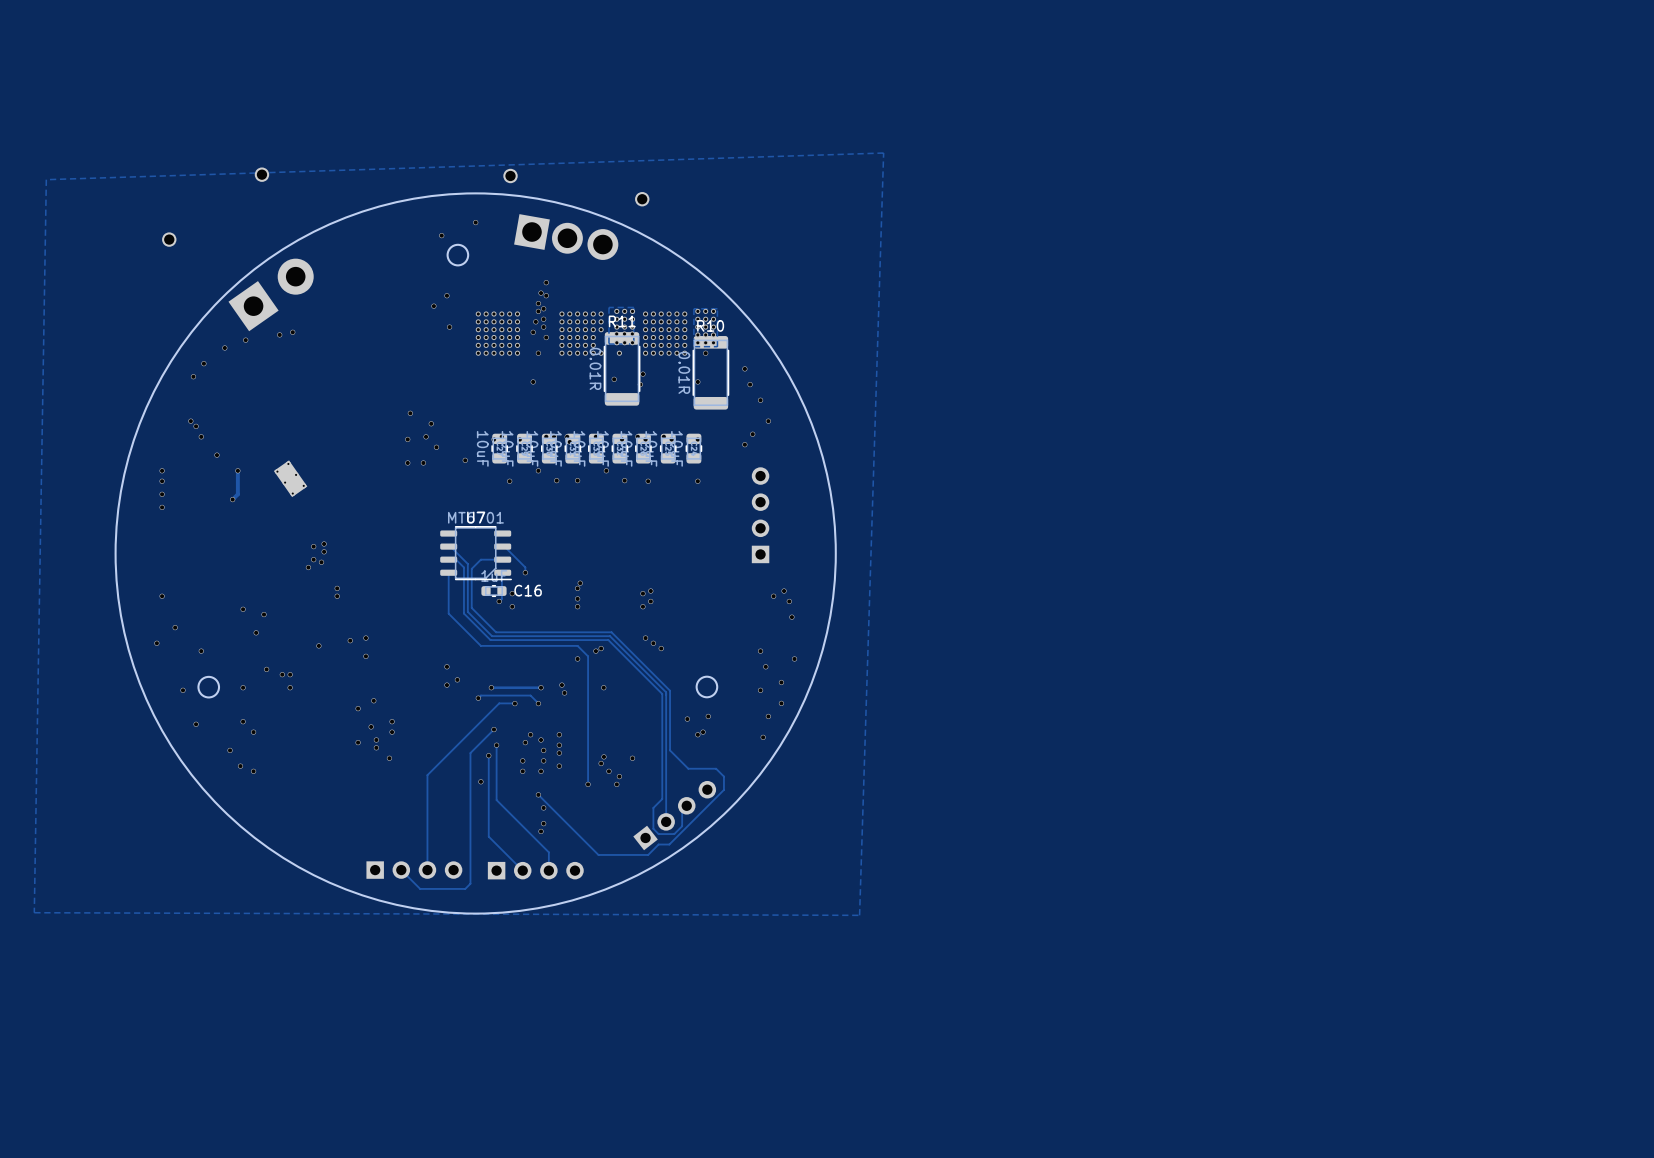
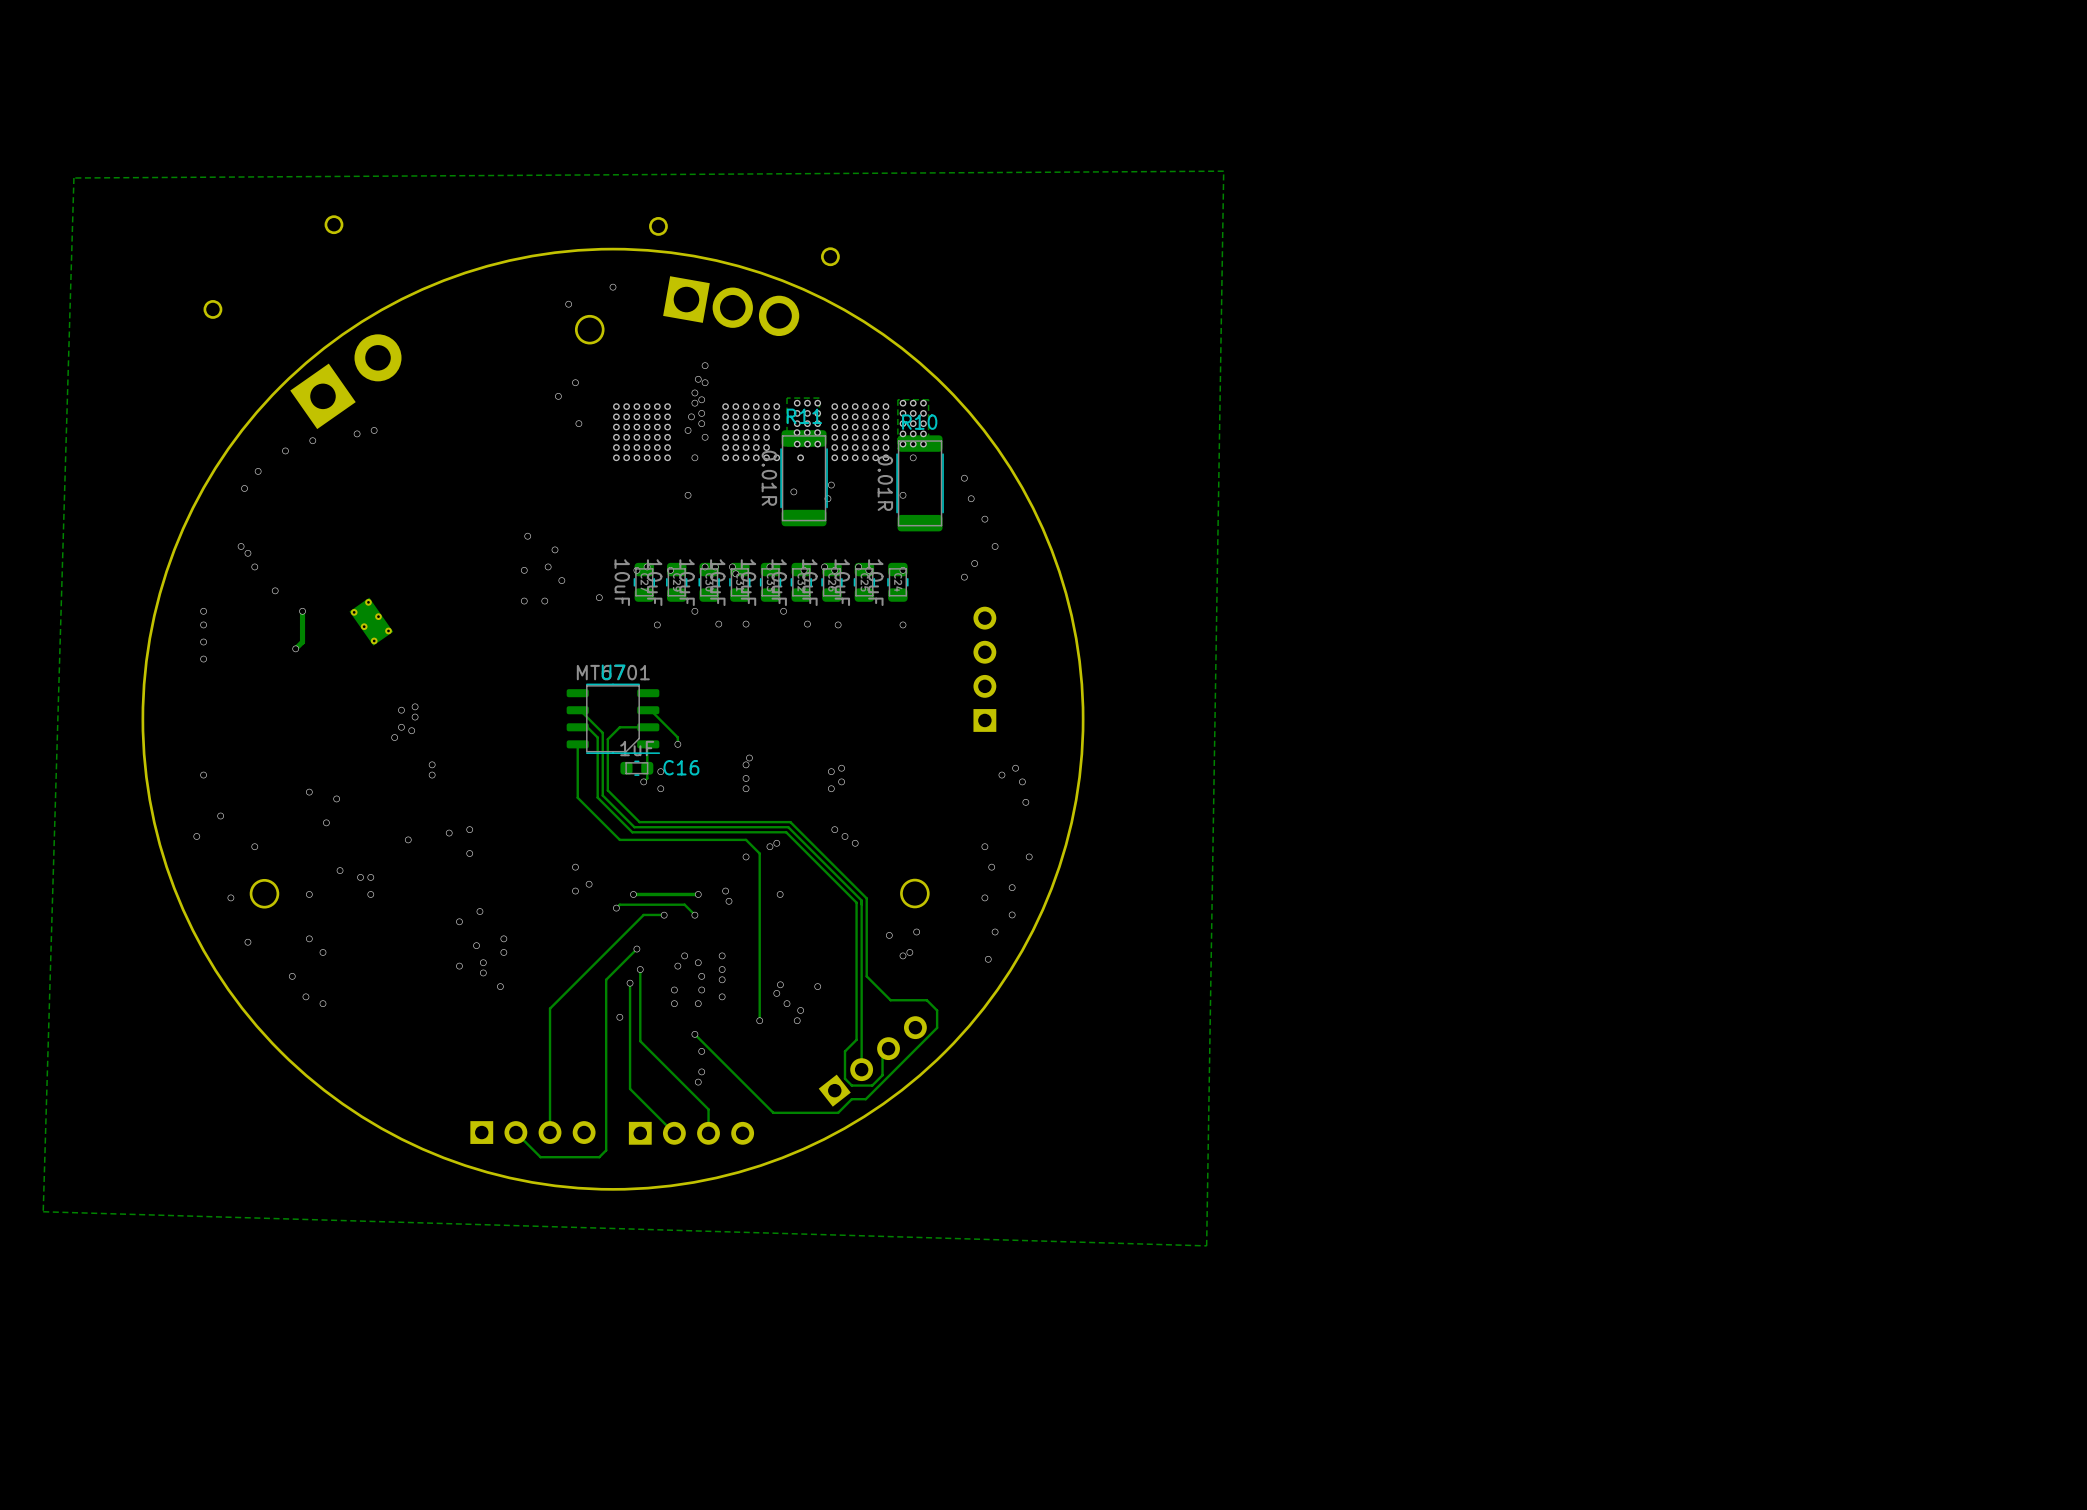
zone outline: (883, 153) (859, 915) (34, 912) (46, 179) (883, 153) -> (1223, 171) (1206, 1245) (43, 1211) (73, 178) (1223, 171)

